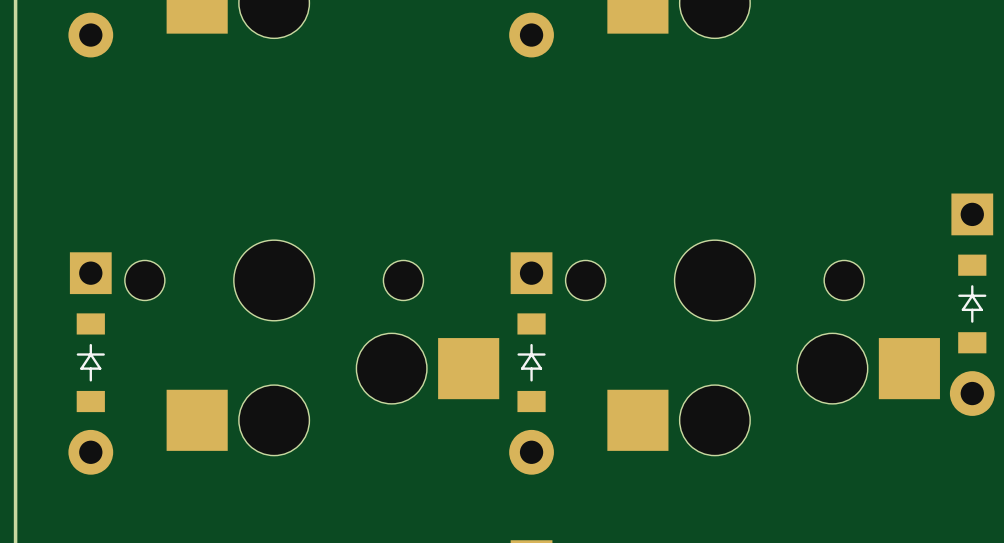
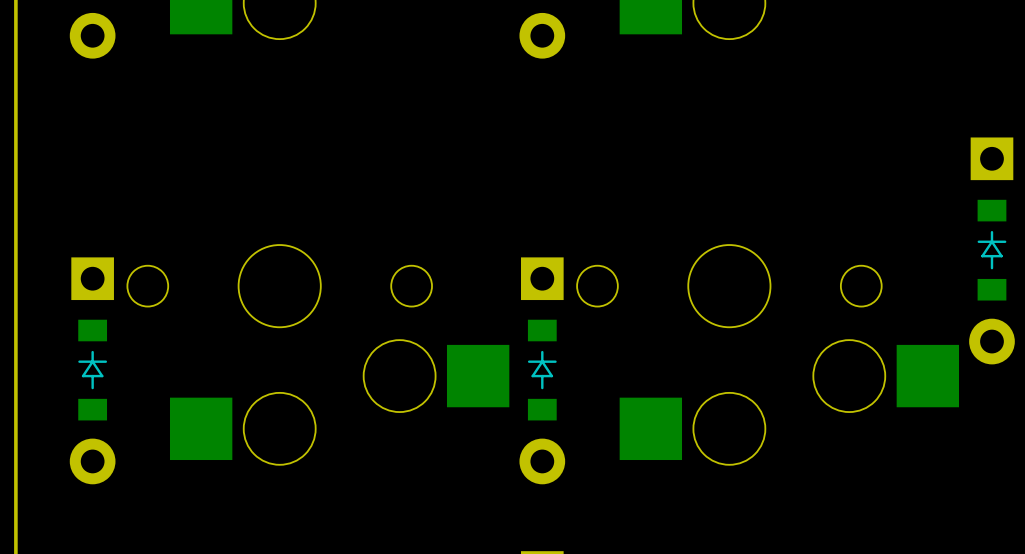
part position: (972, 304) -> (991, 250)

